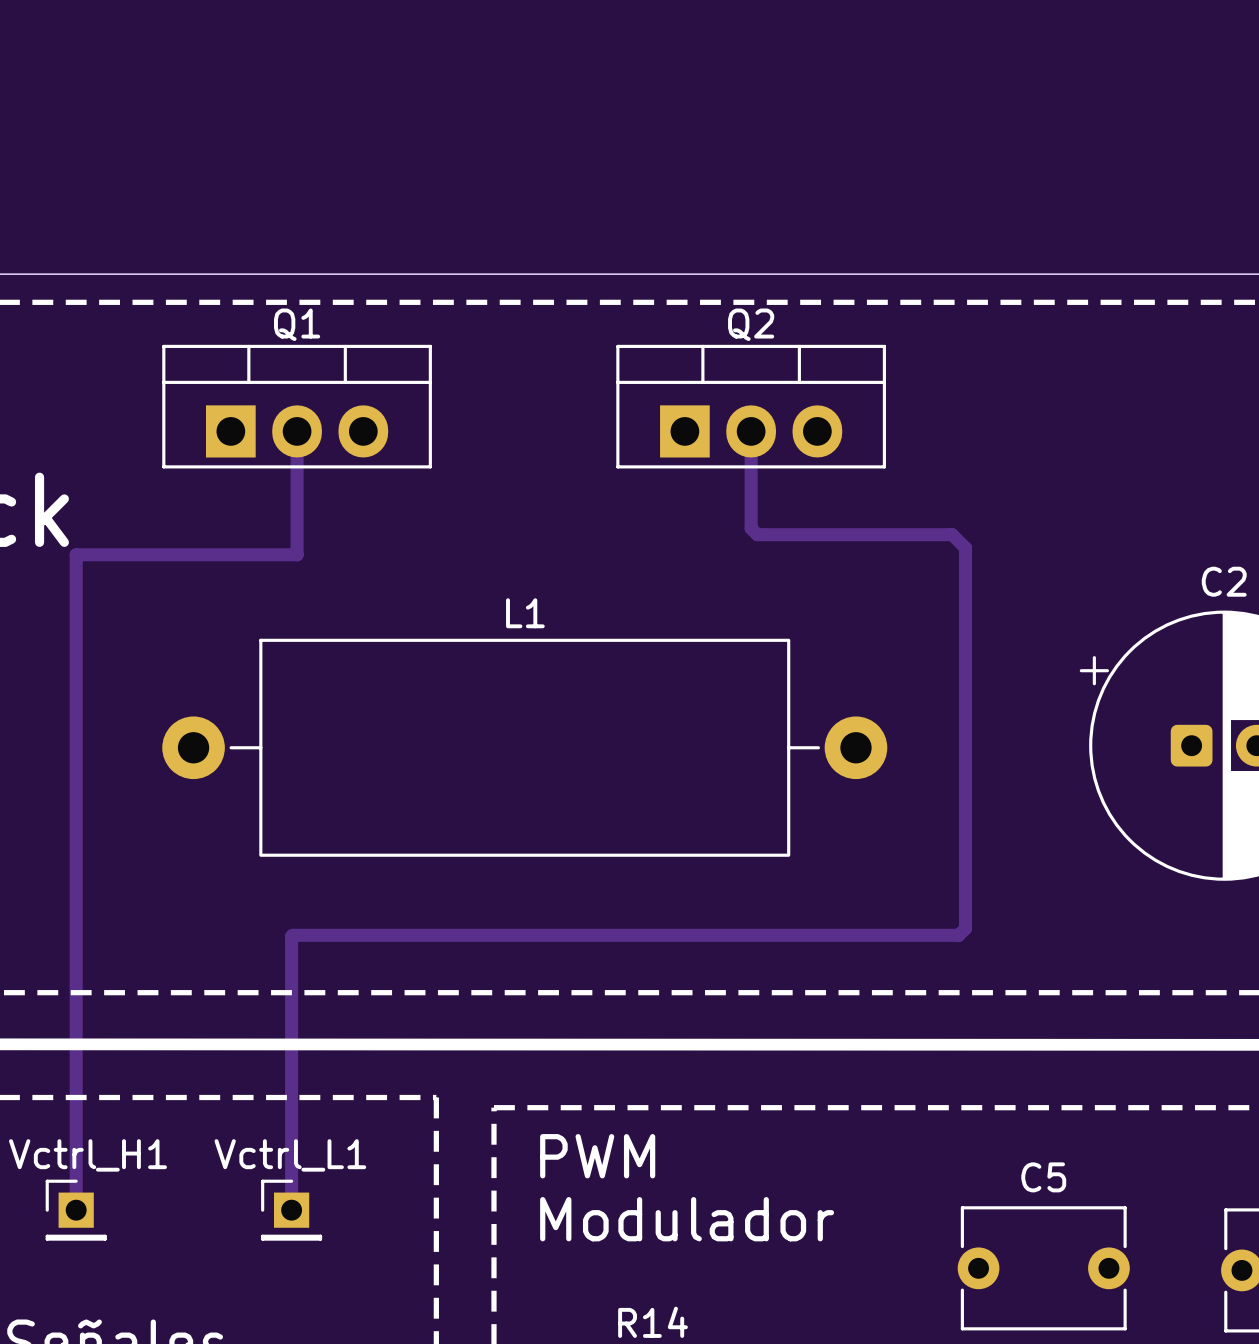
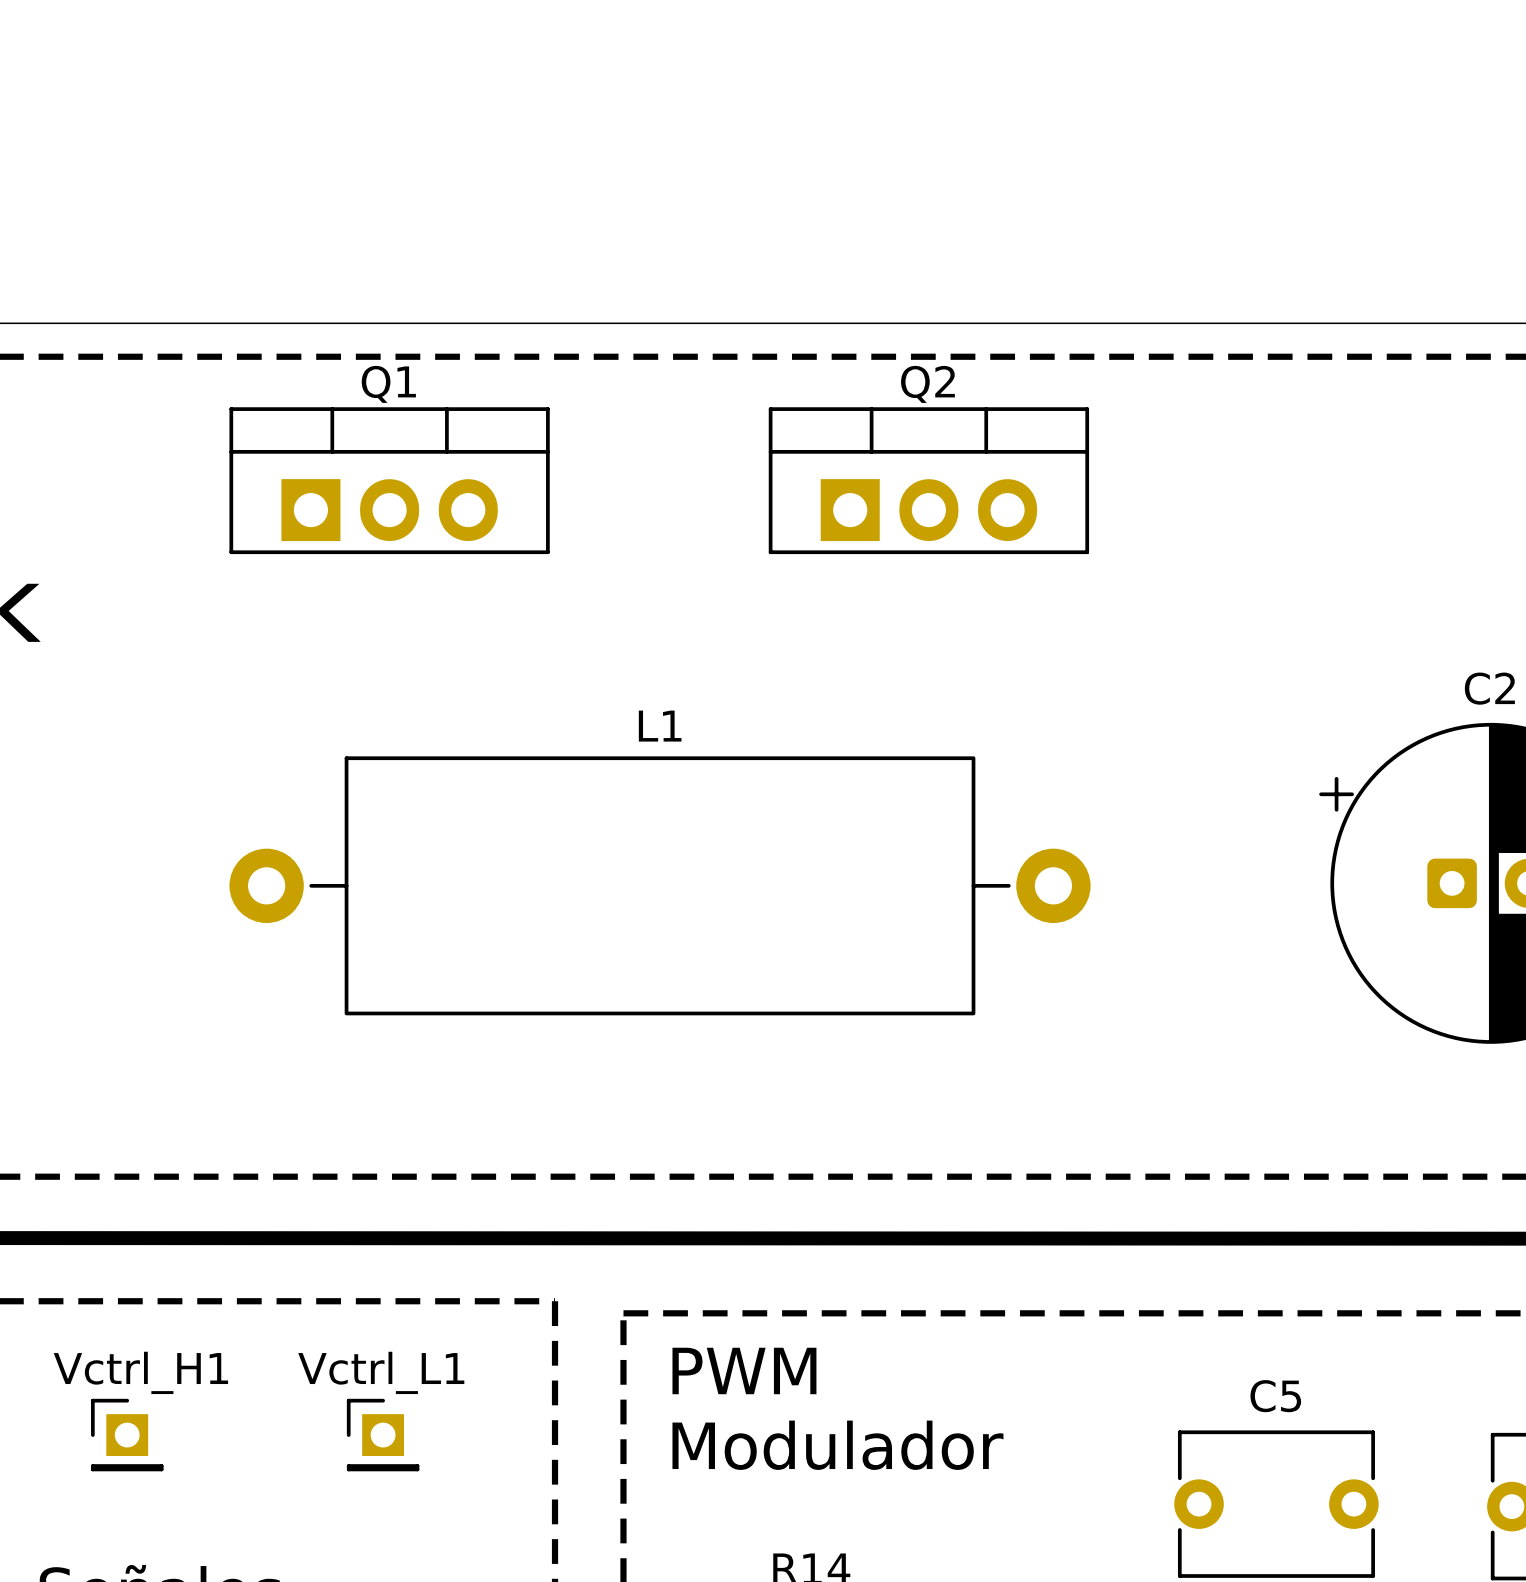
track: (297, 431) (297, 554) (76, 554) (76, 1210) -> none
track: (751, 431) (751, 528) (757, 534) (952, 534) (965, 548) (965, 928) (958, 935) -> none
track: (958, 935) (292, 935) (291, 1210) -> none

